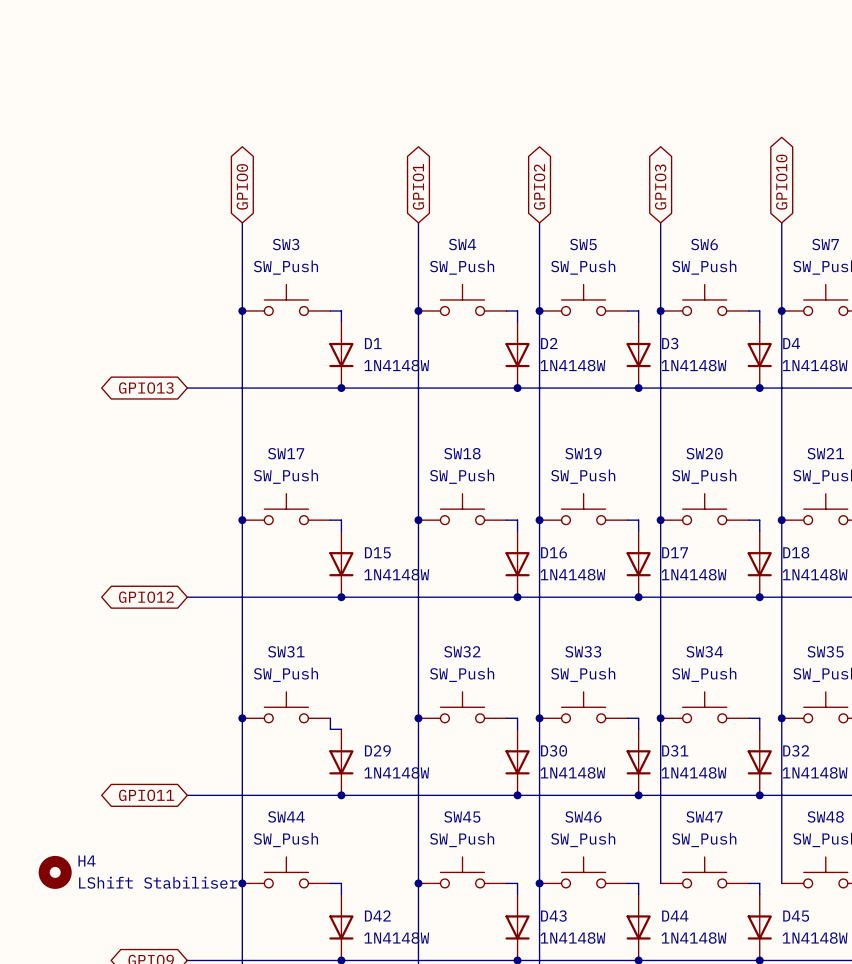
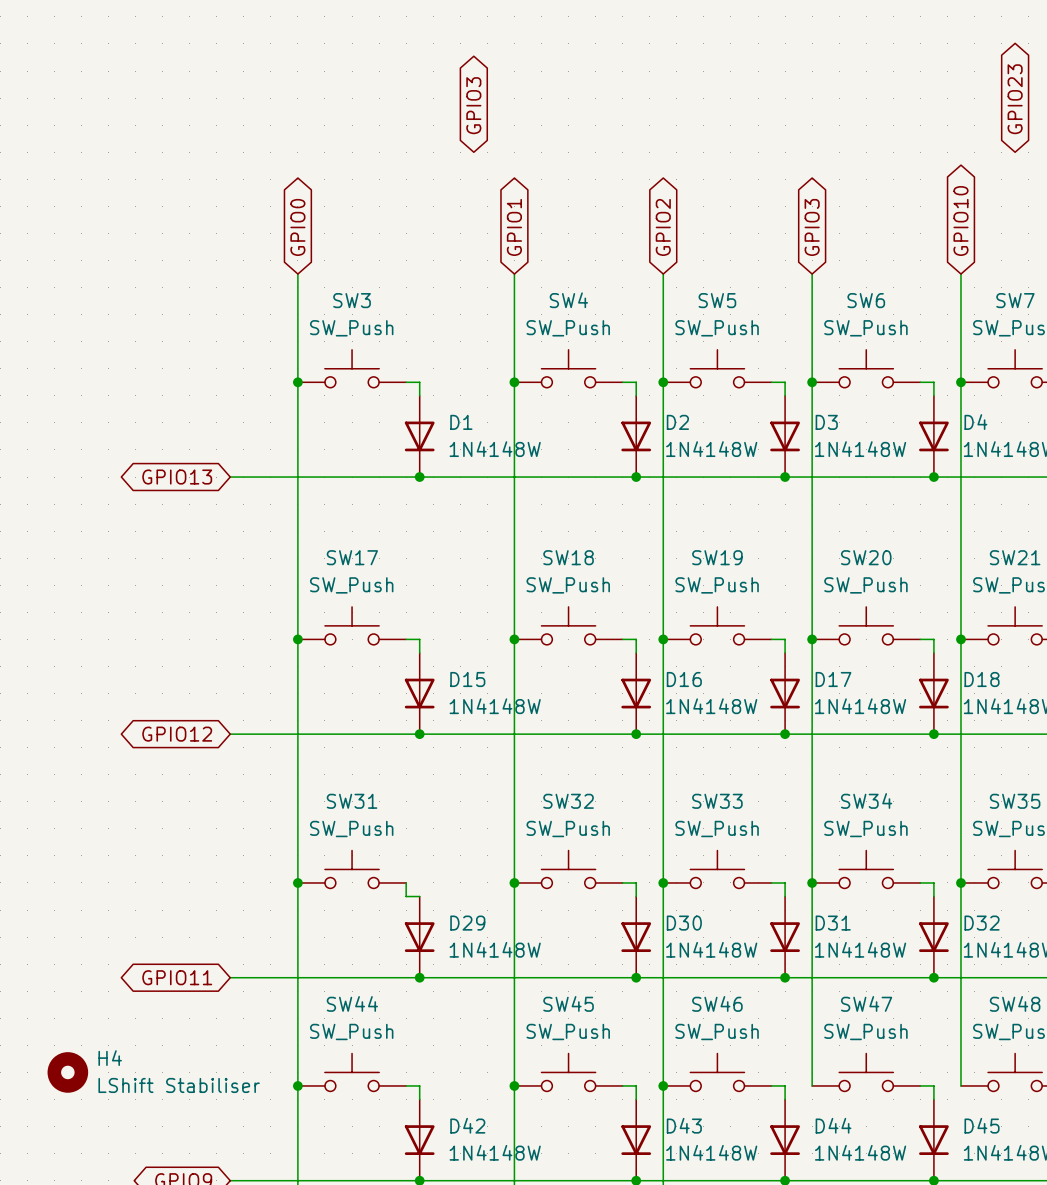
global label: none -> GPIO23 (1015, 99)
global label: none -> GPIO3 (473, 105)

